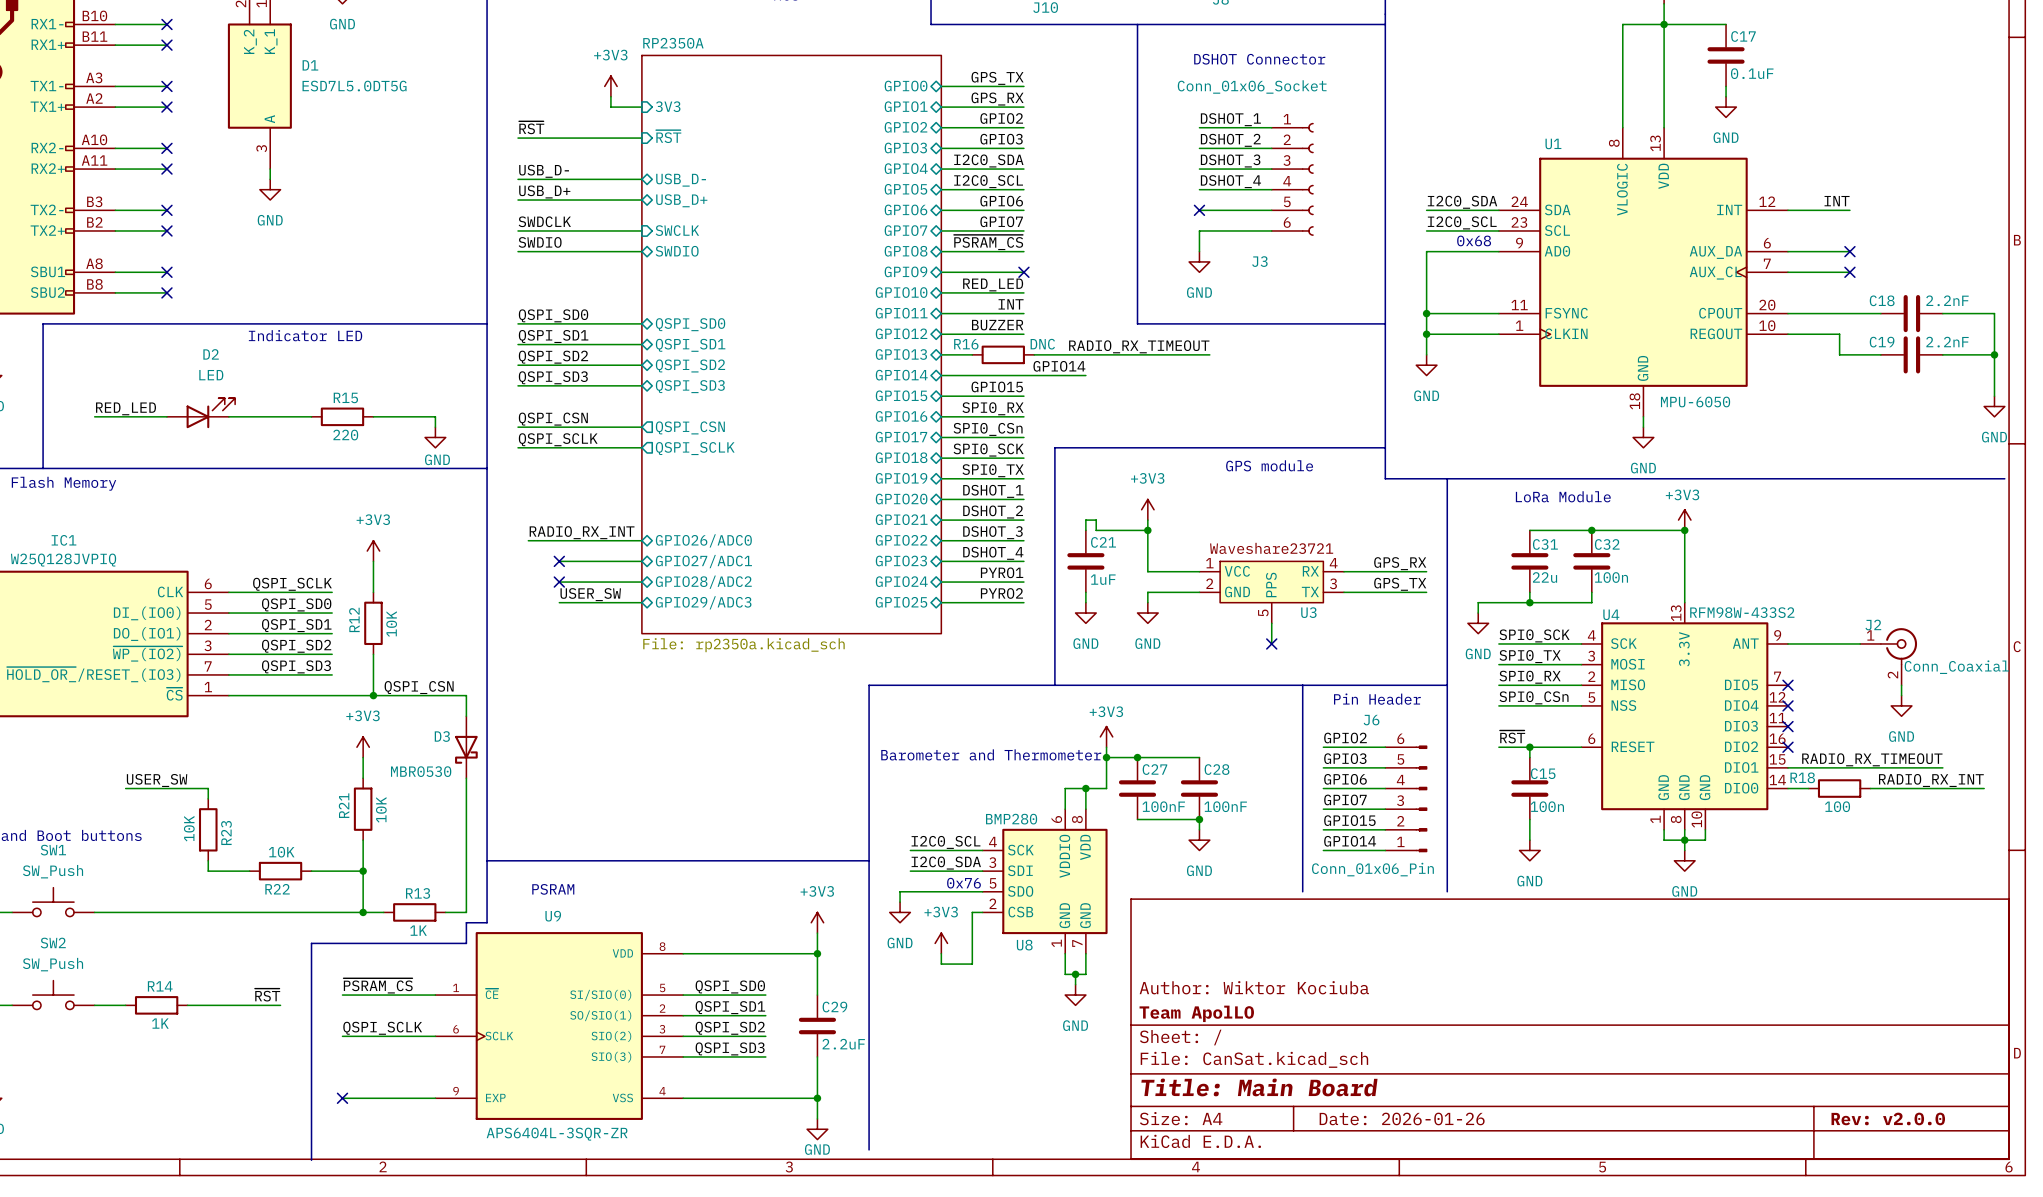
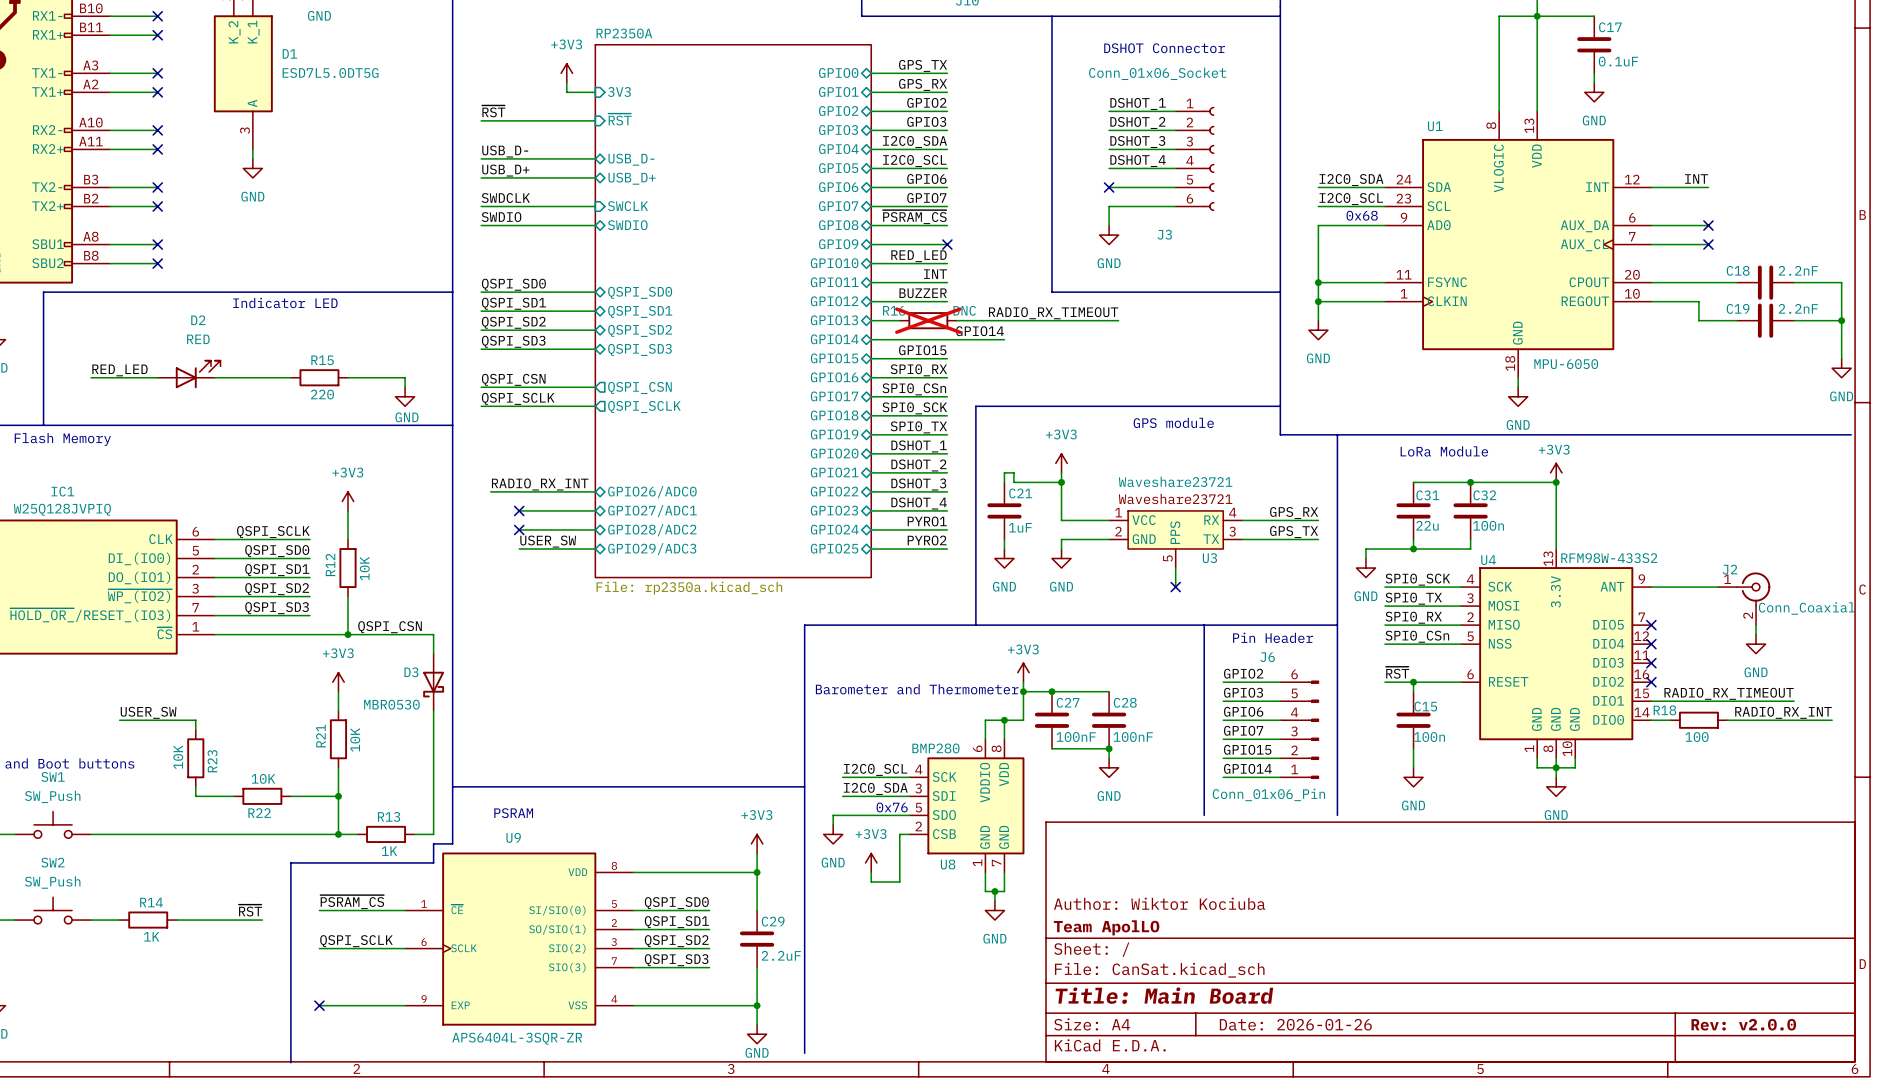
R16 do-not-place cross: none -> (928, 320)
D2 value: LED (211, 375) -> RED (198, 339)
U3 value: none -> Waveshare23721 (1175, 481)

